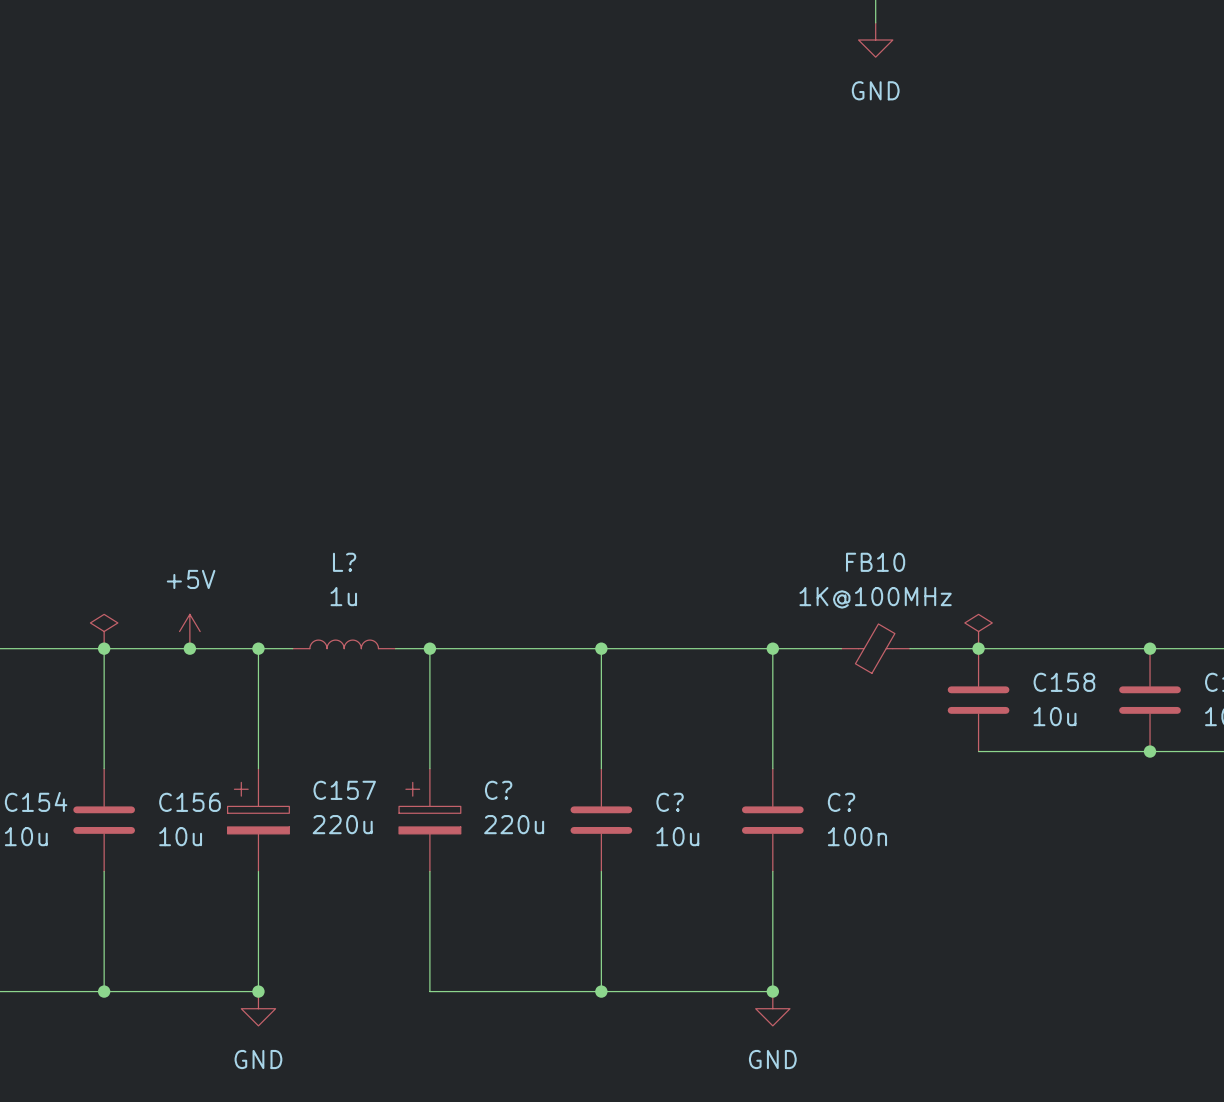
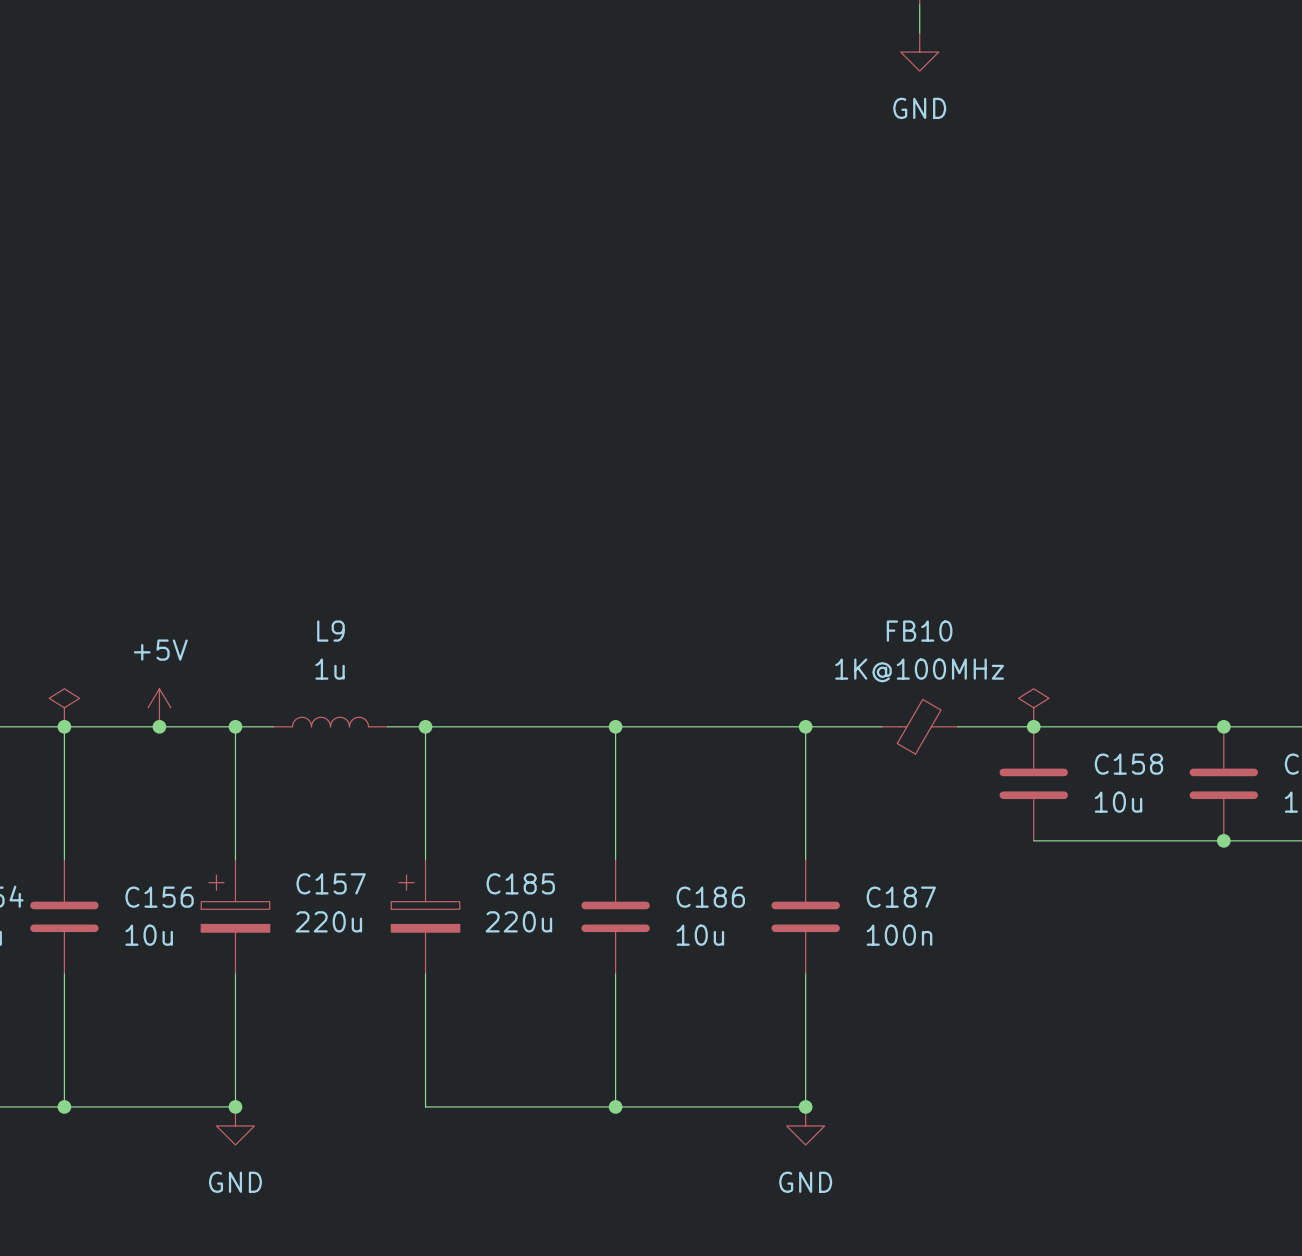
L? name: L? (344, 562) -> L9 (330, 631)
C? name: C? (498, 790) -> C185 (520, 883)
C? name: C? (670, 802) -> C186 (710, 897)
C? name: C? (841, 802) -> C187 (901, 897)

